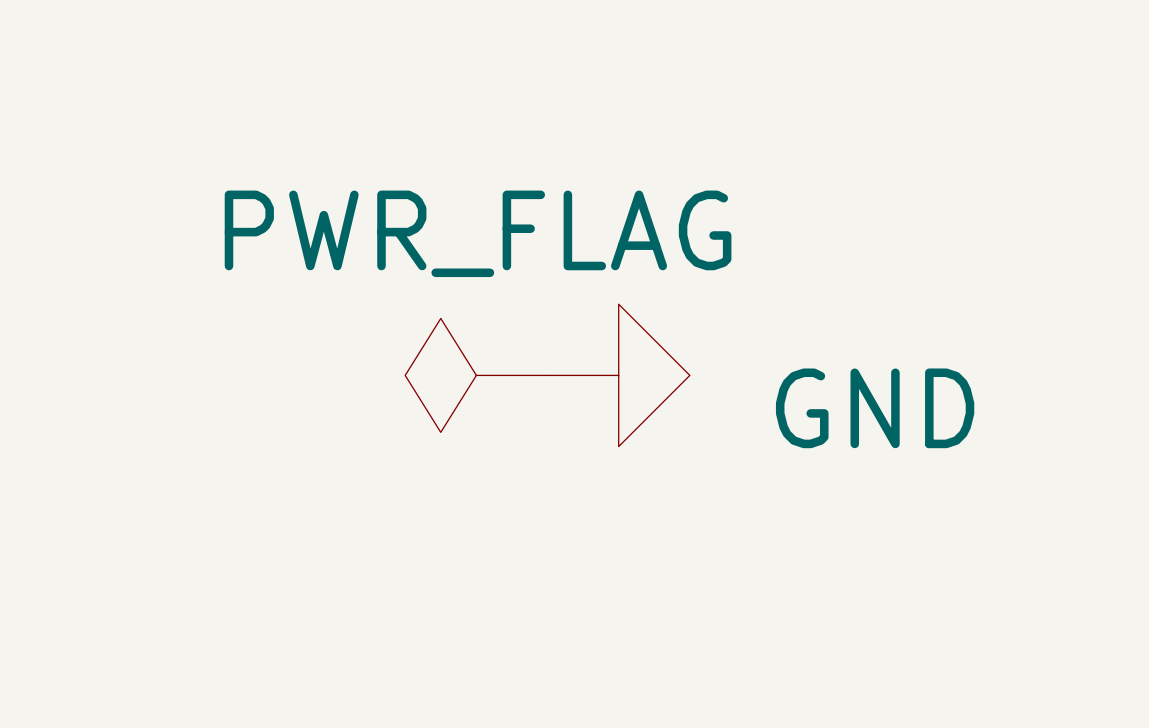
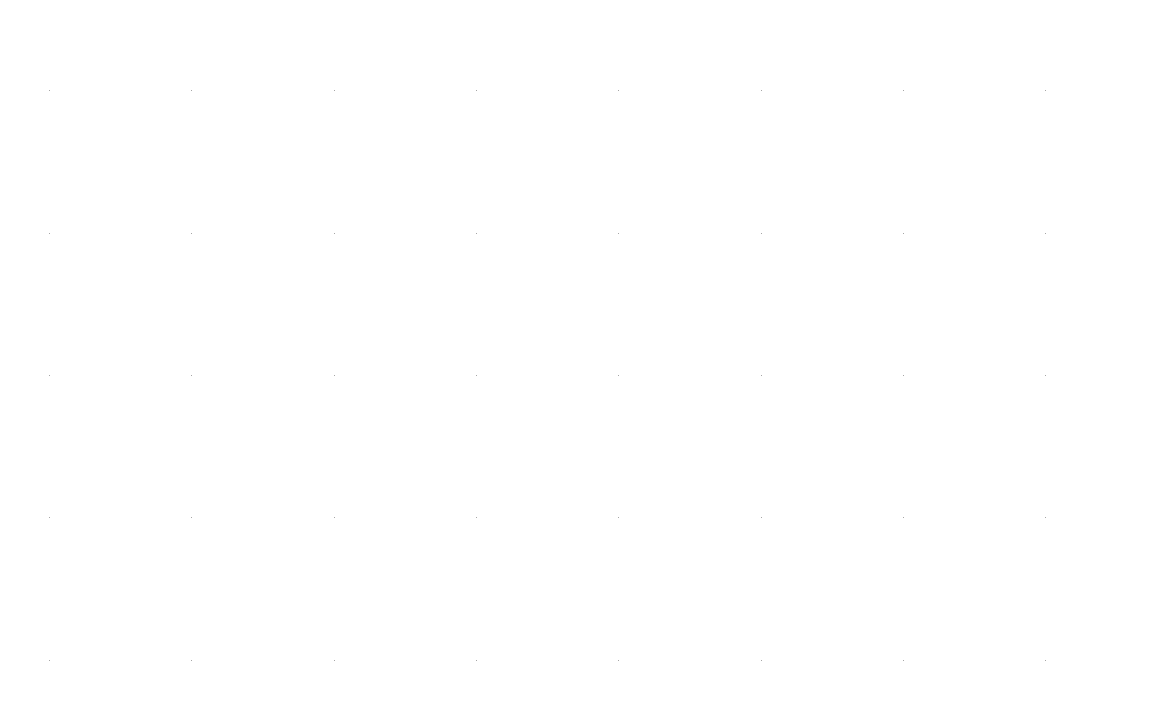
power symbol: PWR_FLAG (476, 375) -> none
power symbol: GND (618, 375) -> none

